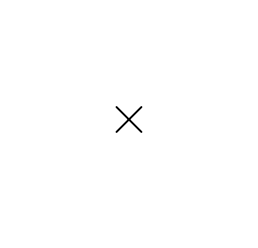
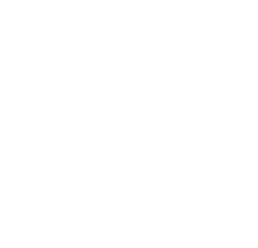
no-connect mark: (128, 119) -> none

